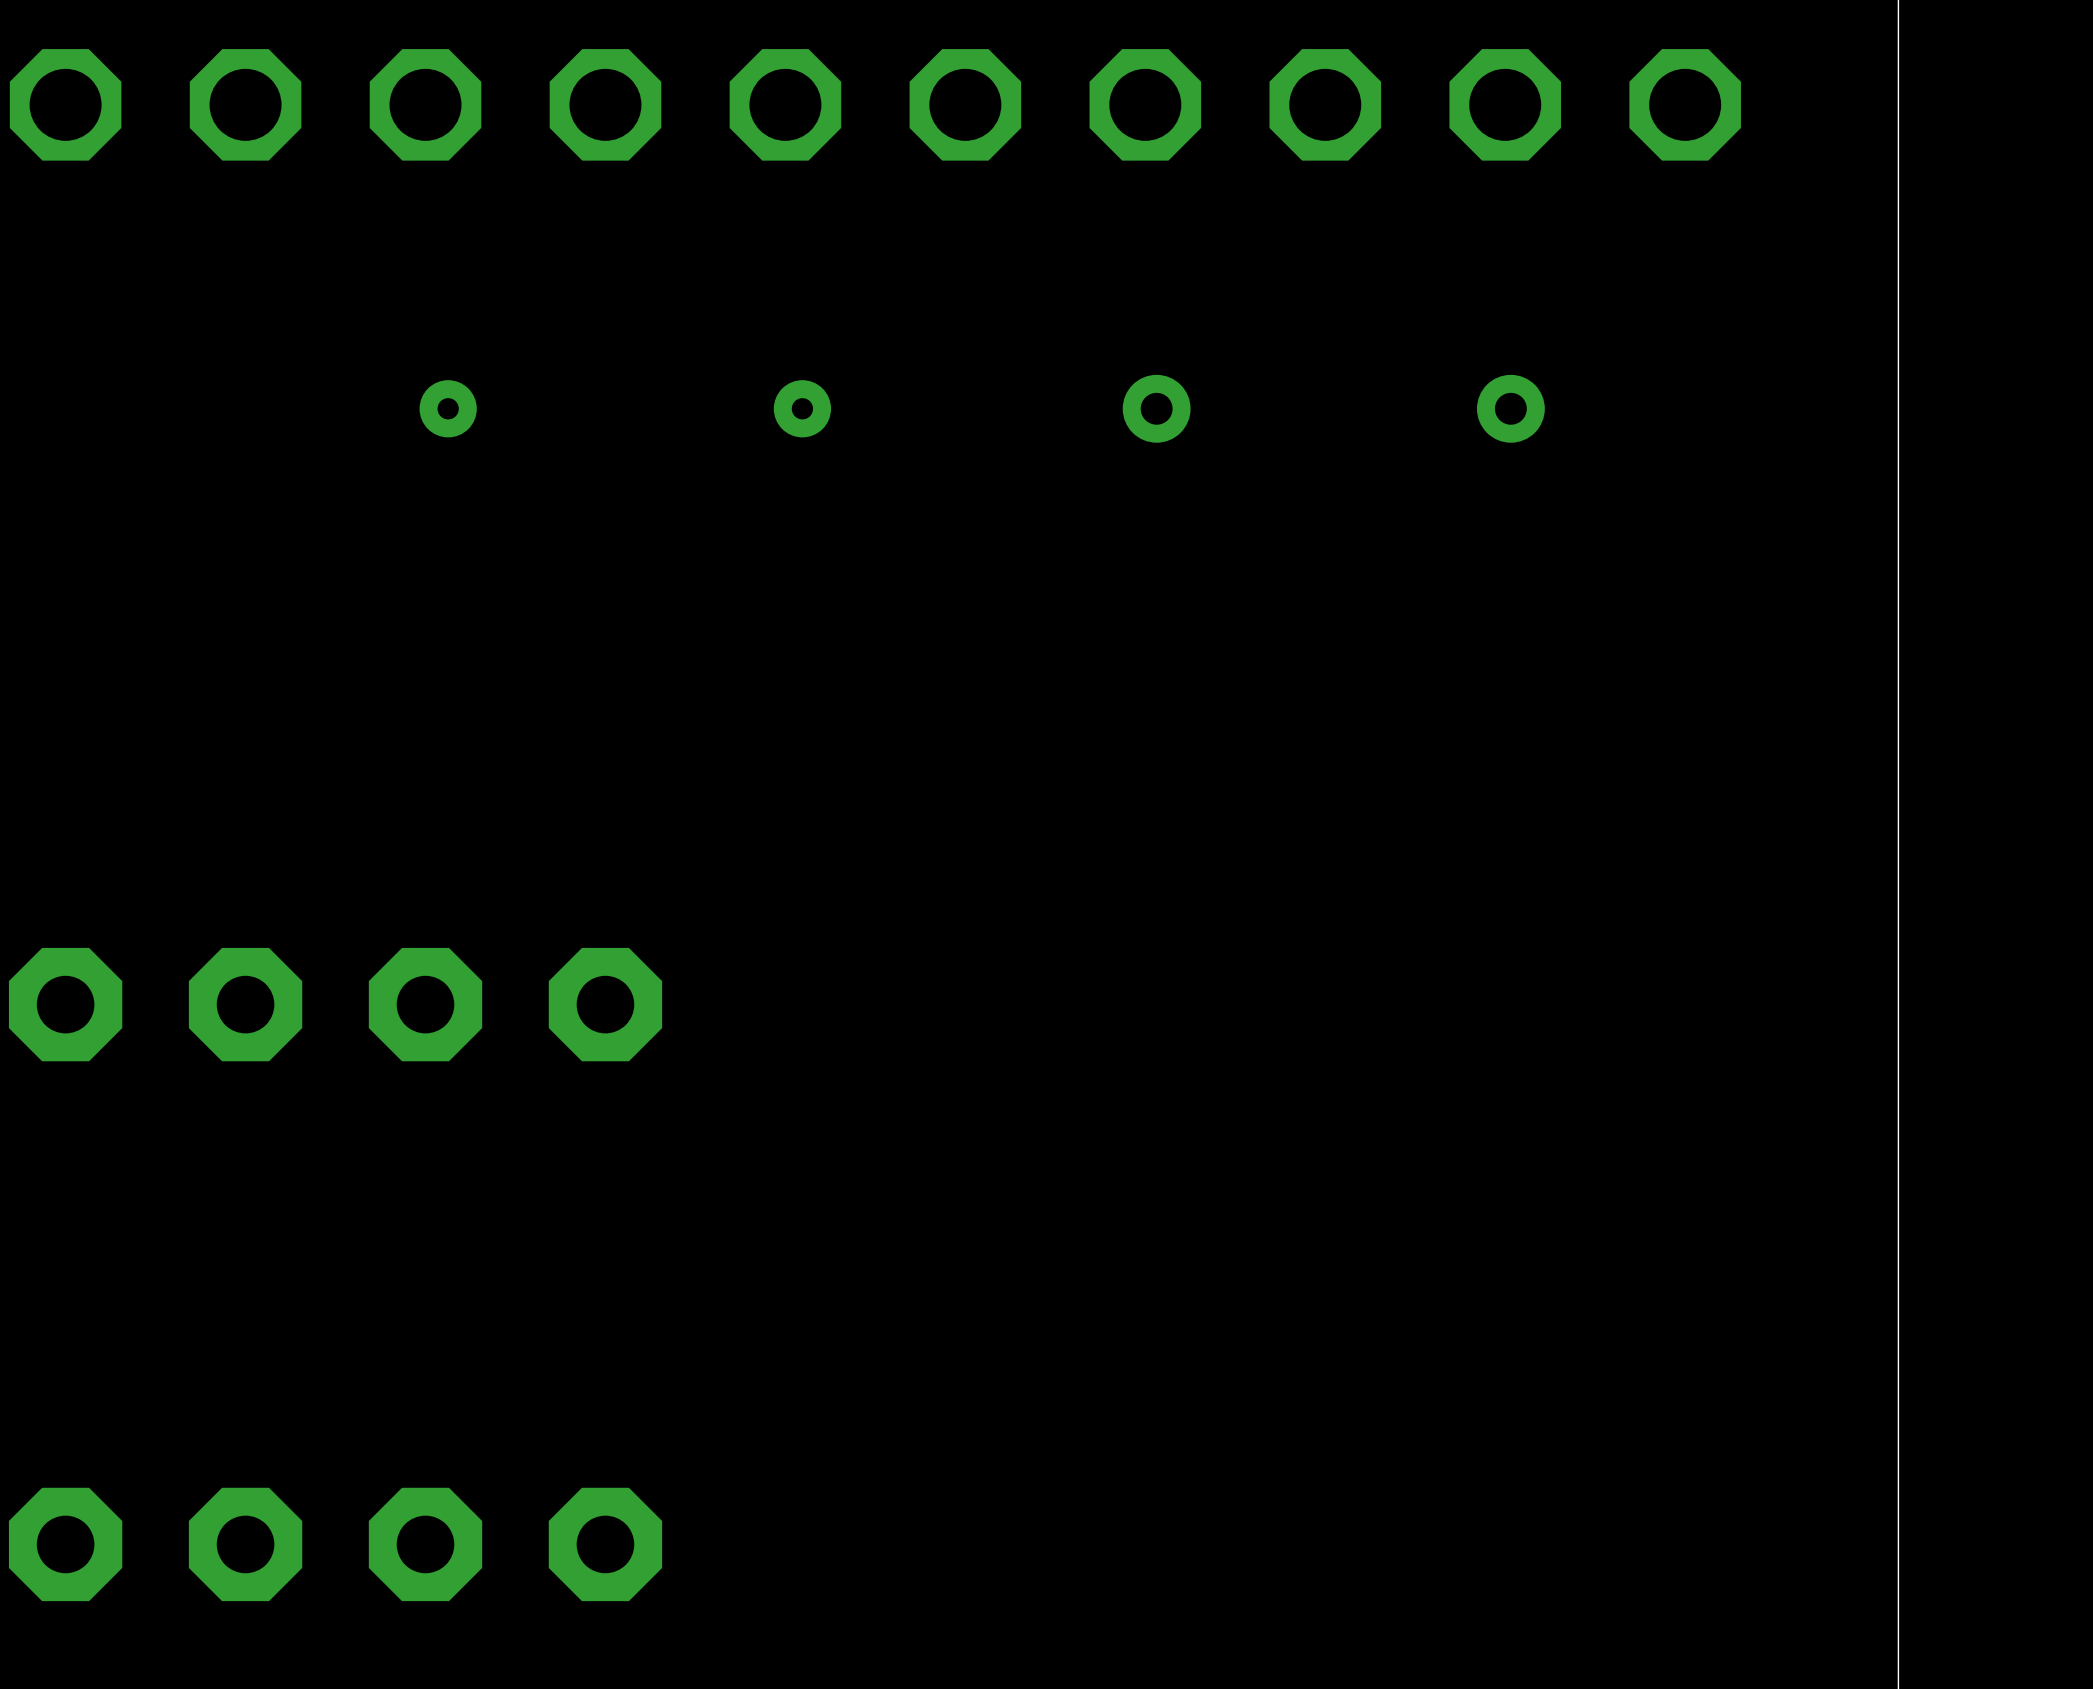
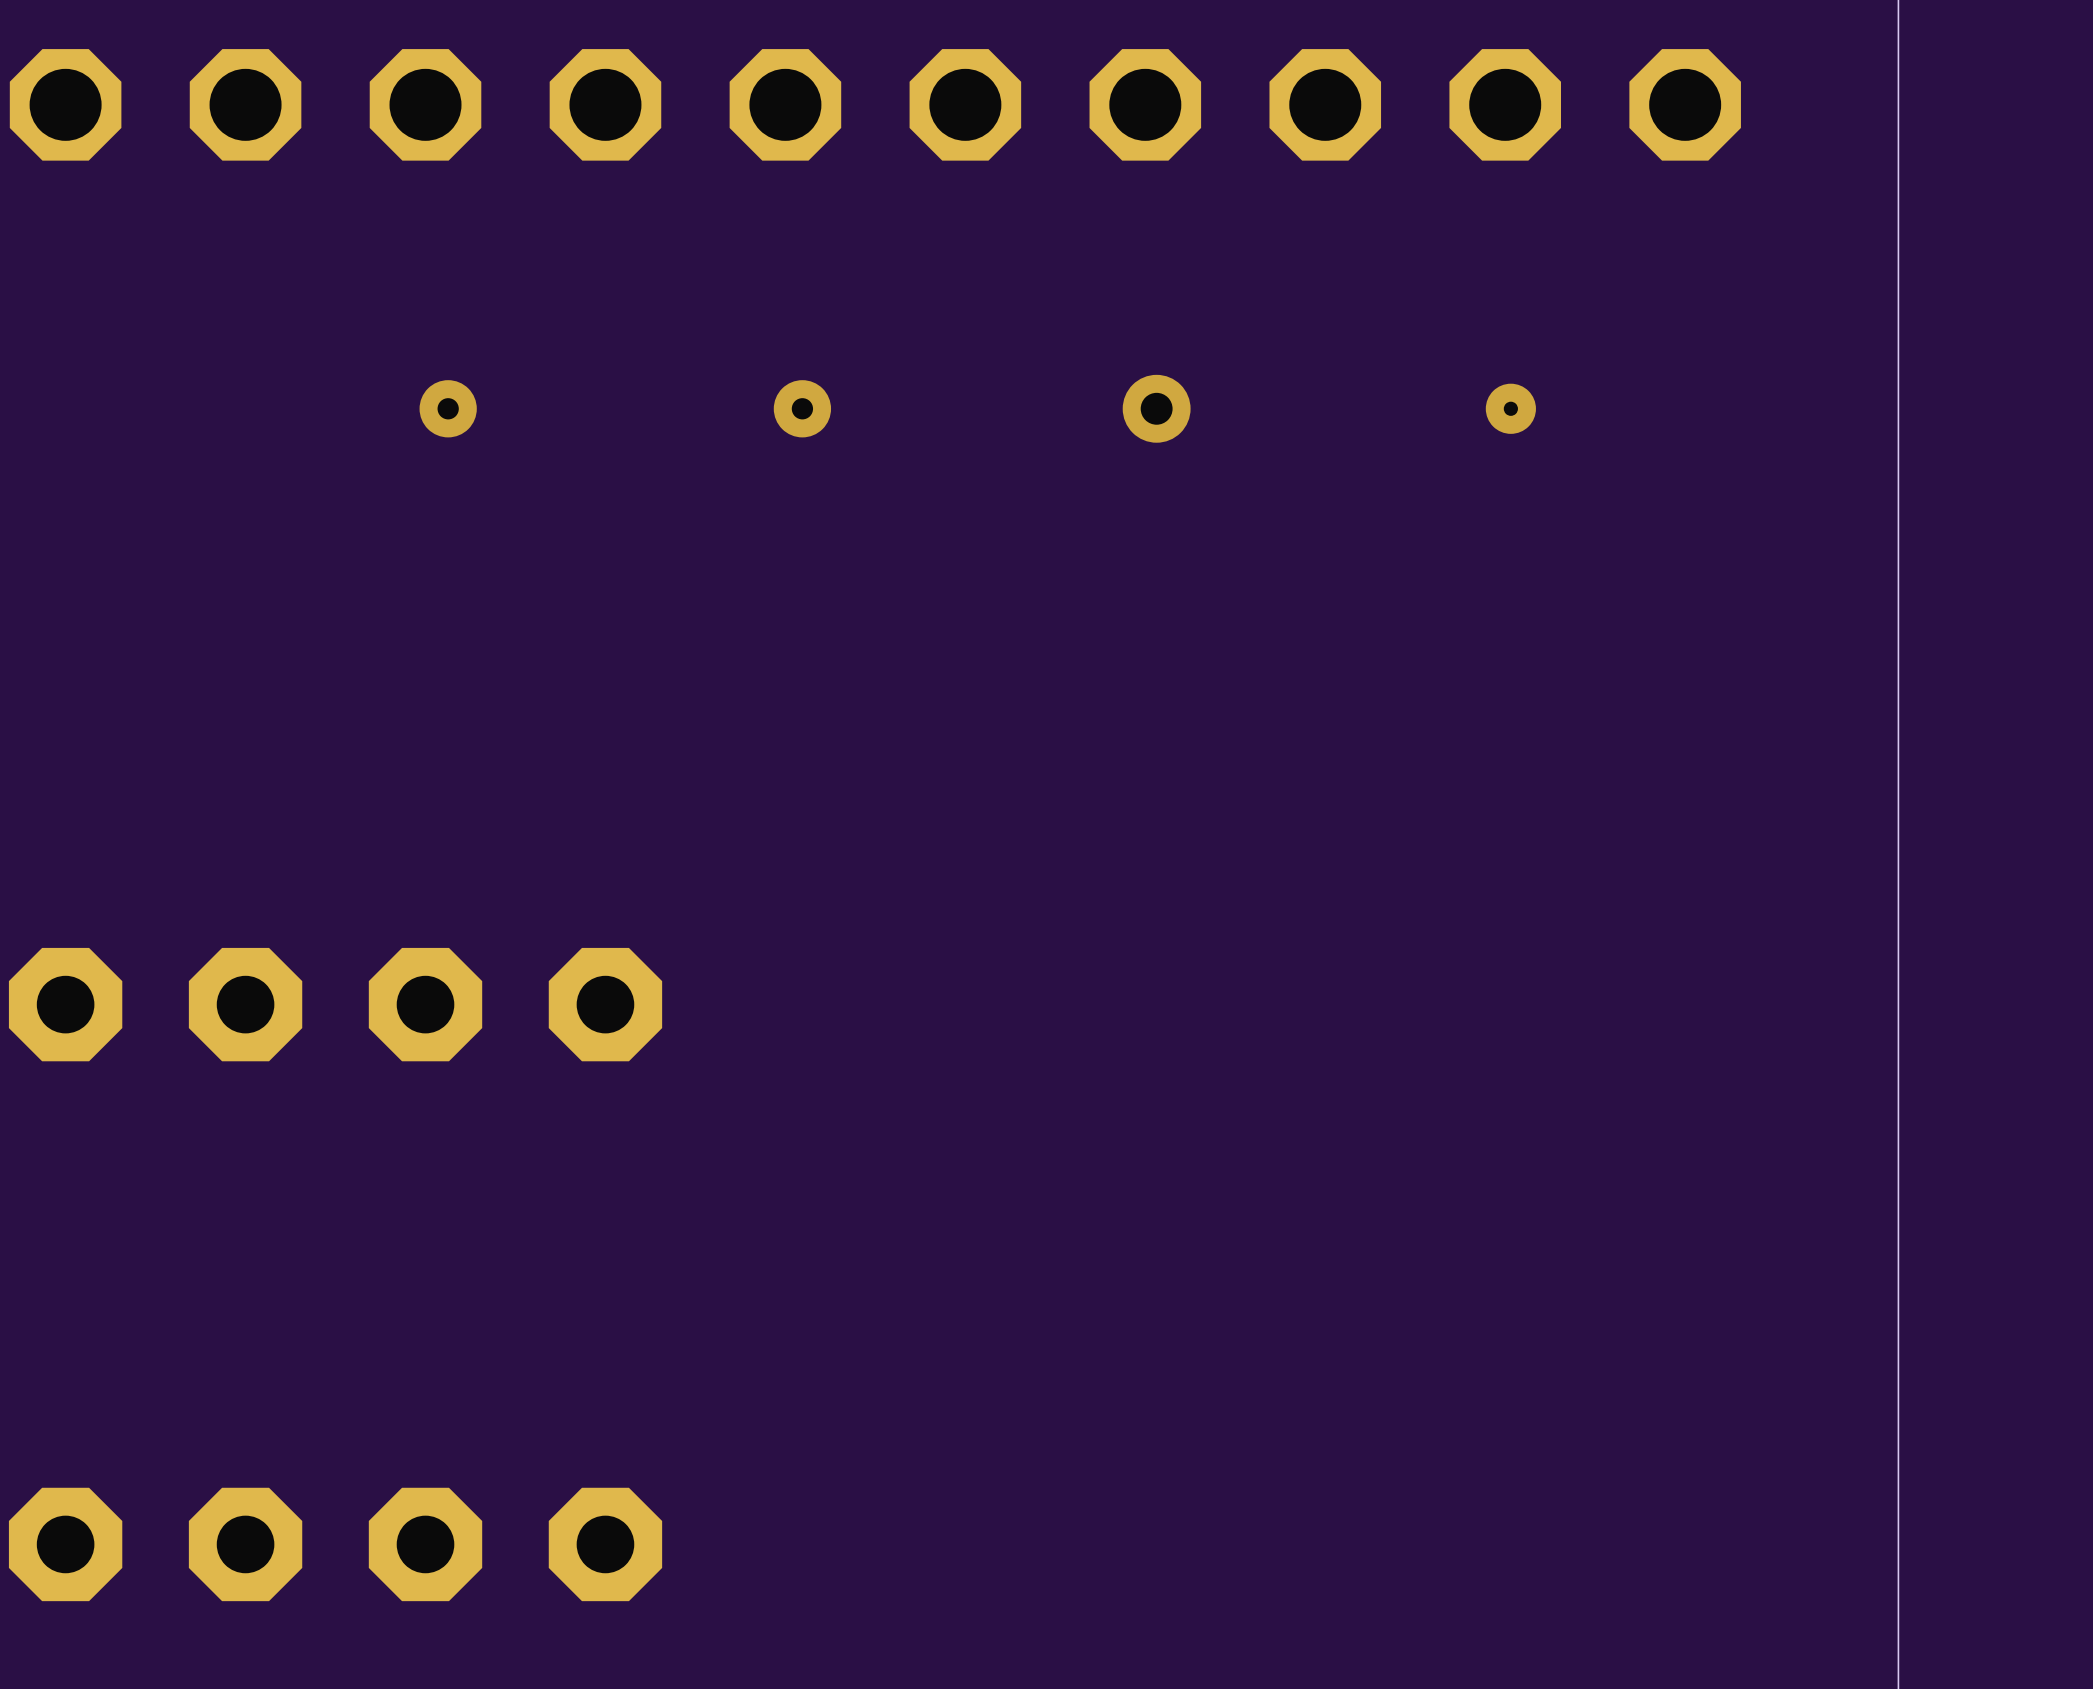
via size: [1476, 374, 1545, 443] -> [1485, 383, 1536, 434]

